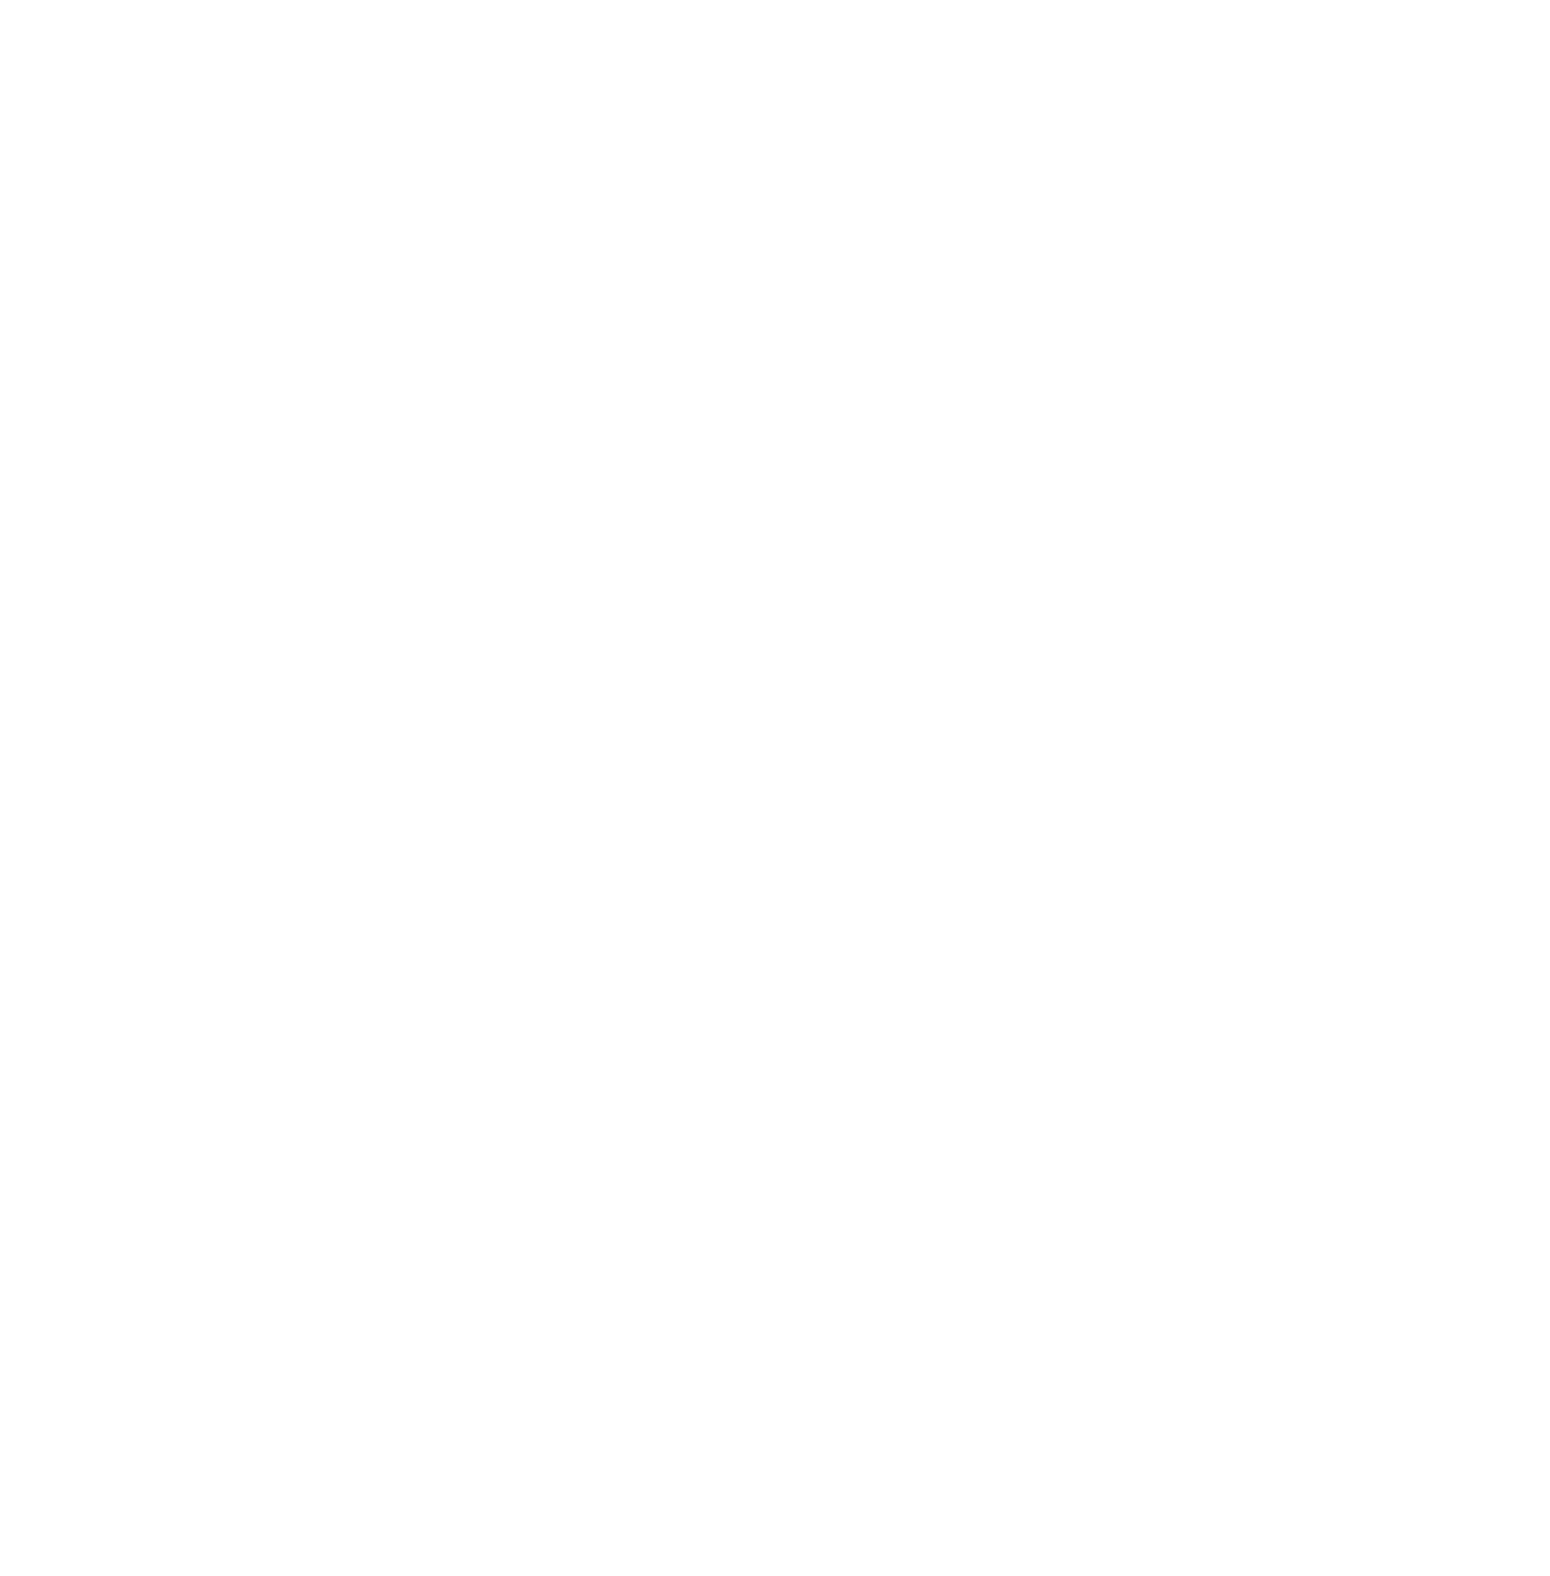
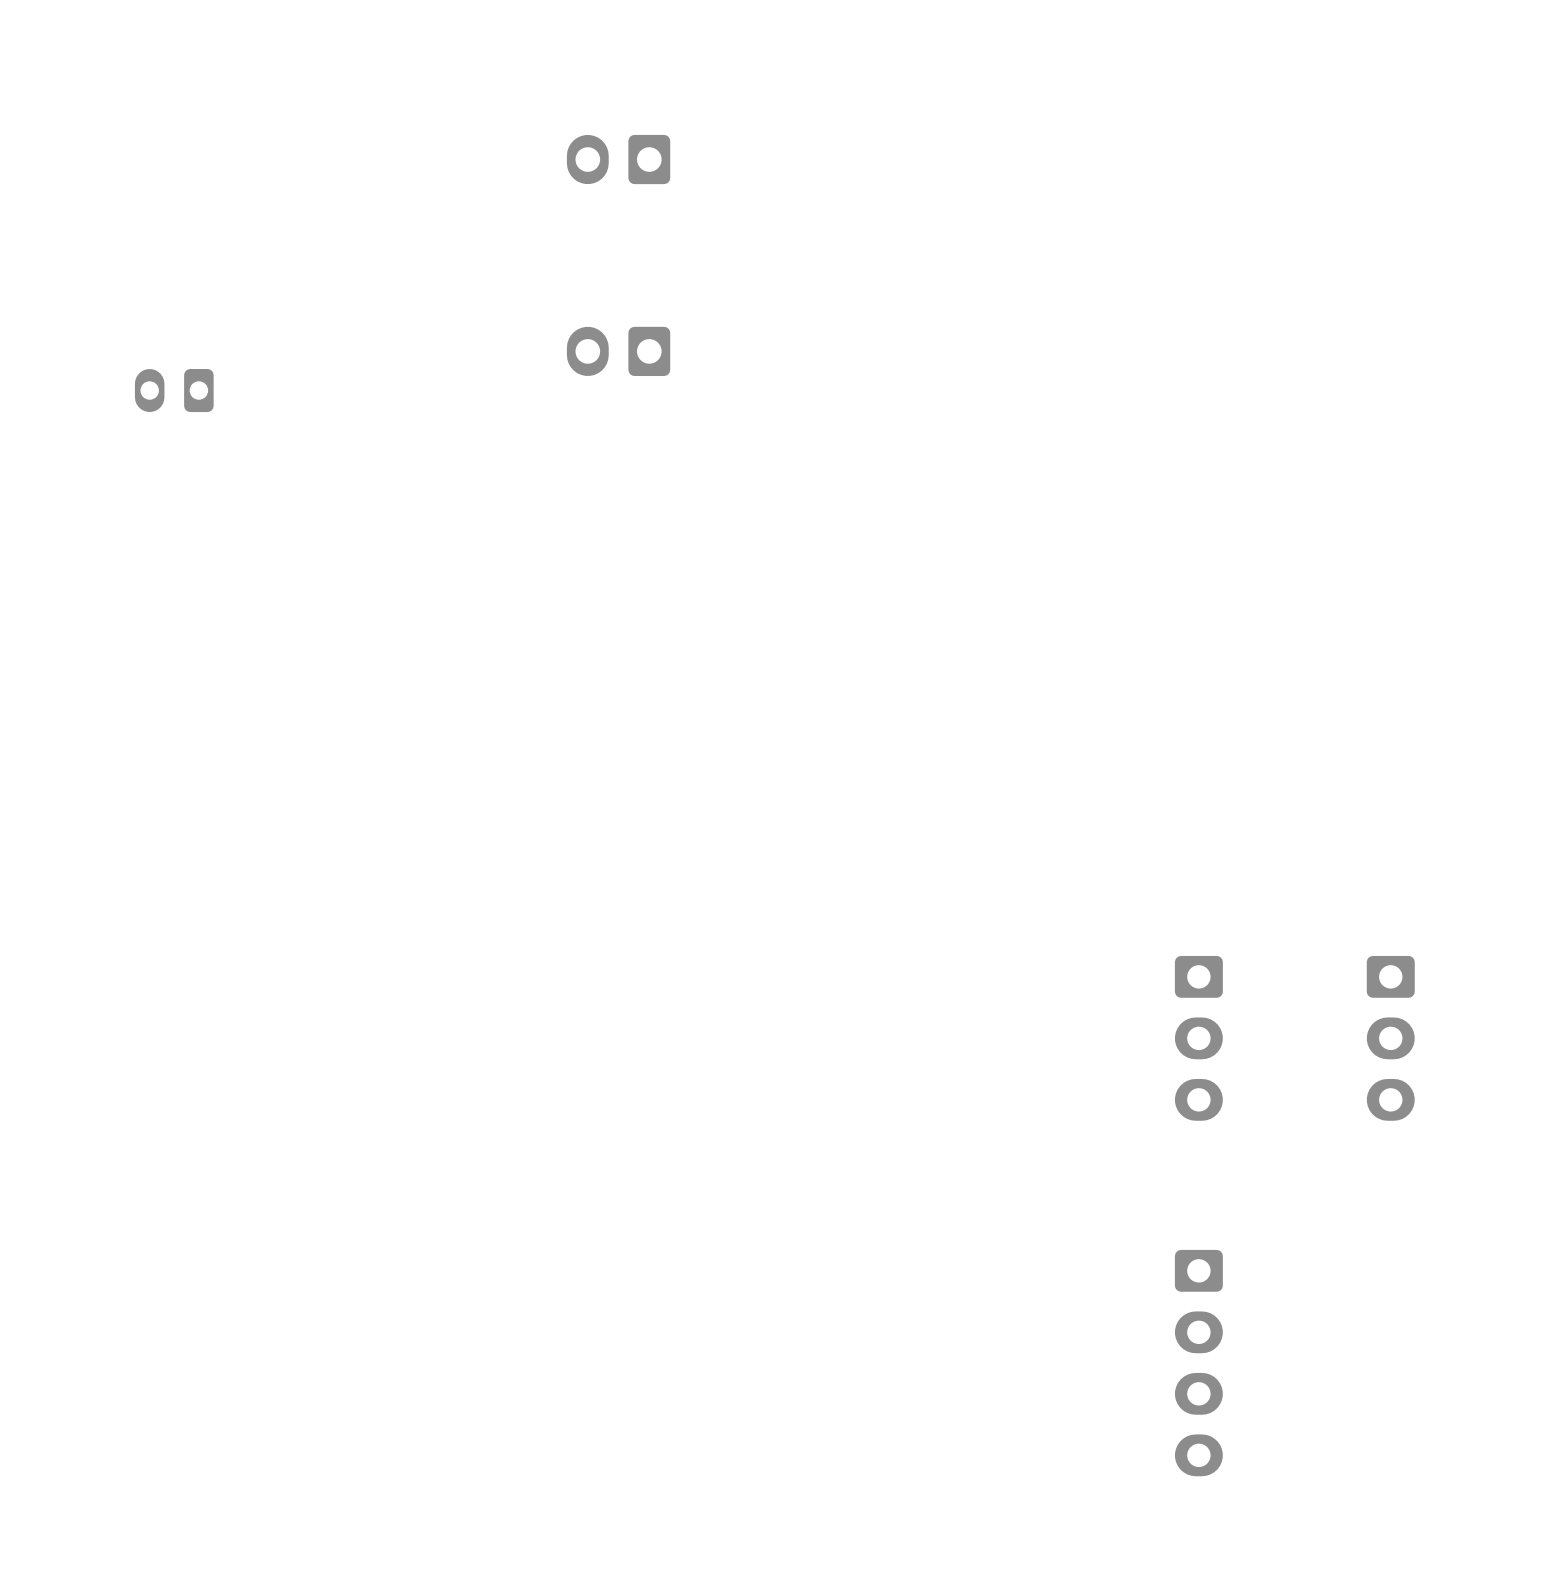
part: none -> (618, 159)
part: none -> (618, 351)
part: none -> (174, 390)
part: none -> (1198, 1038)
part: none -> (1390, 1038)
part: none -> (1198, 1363)

